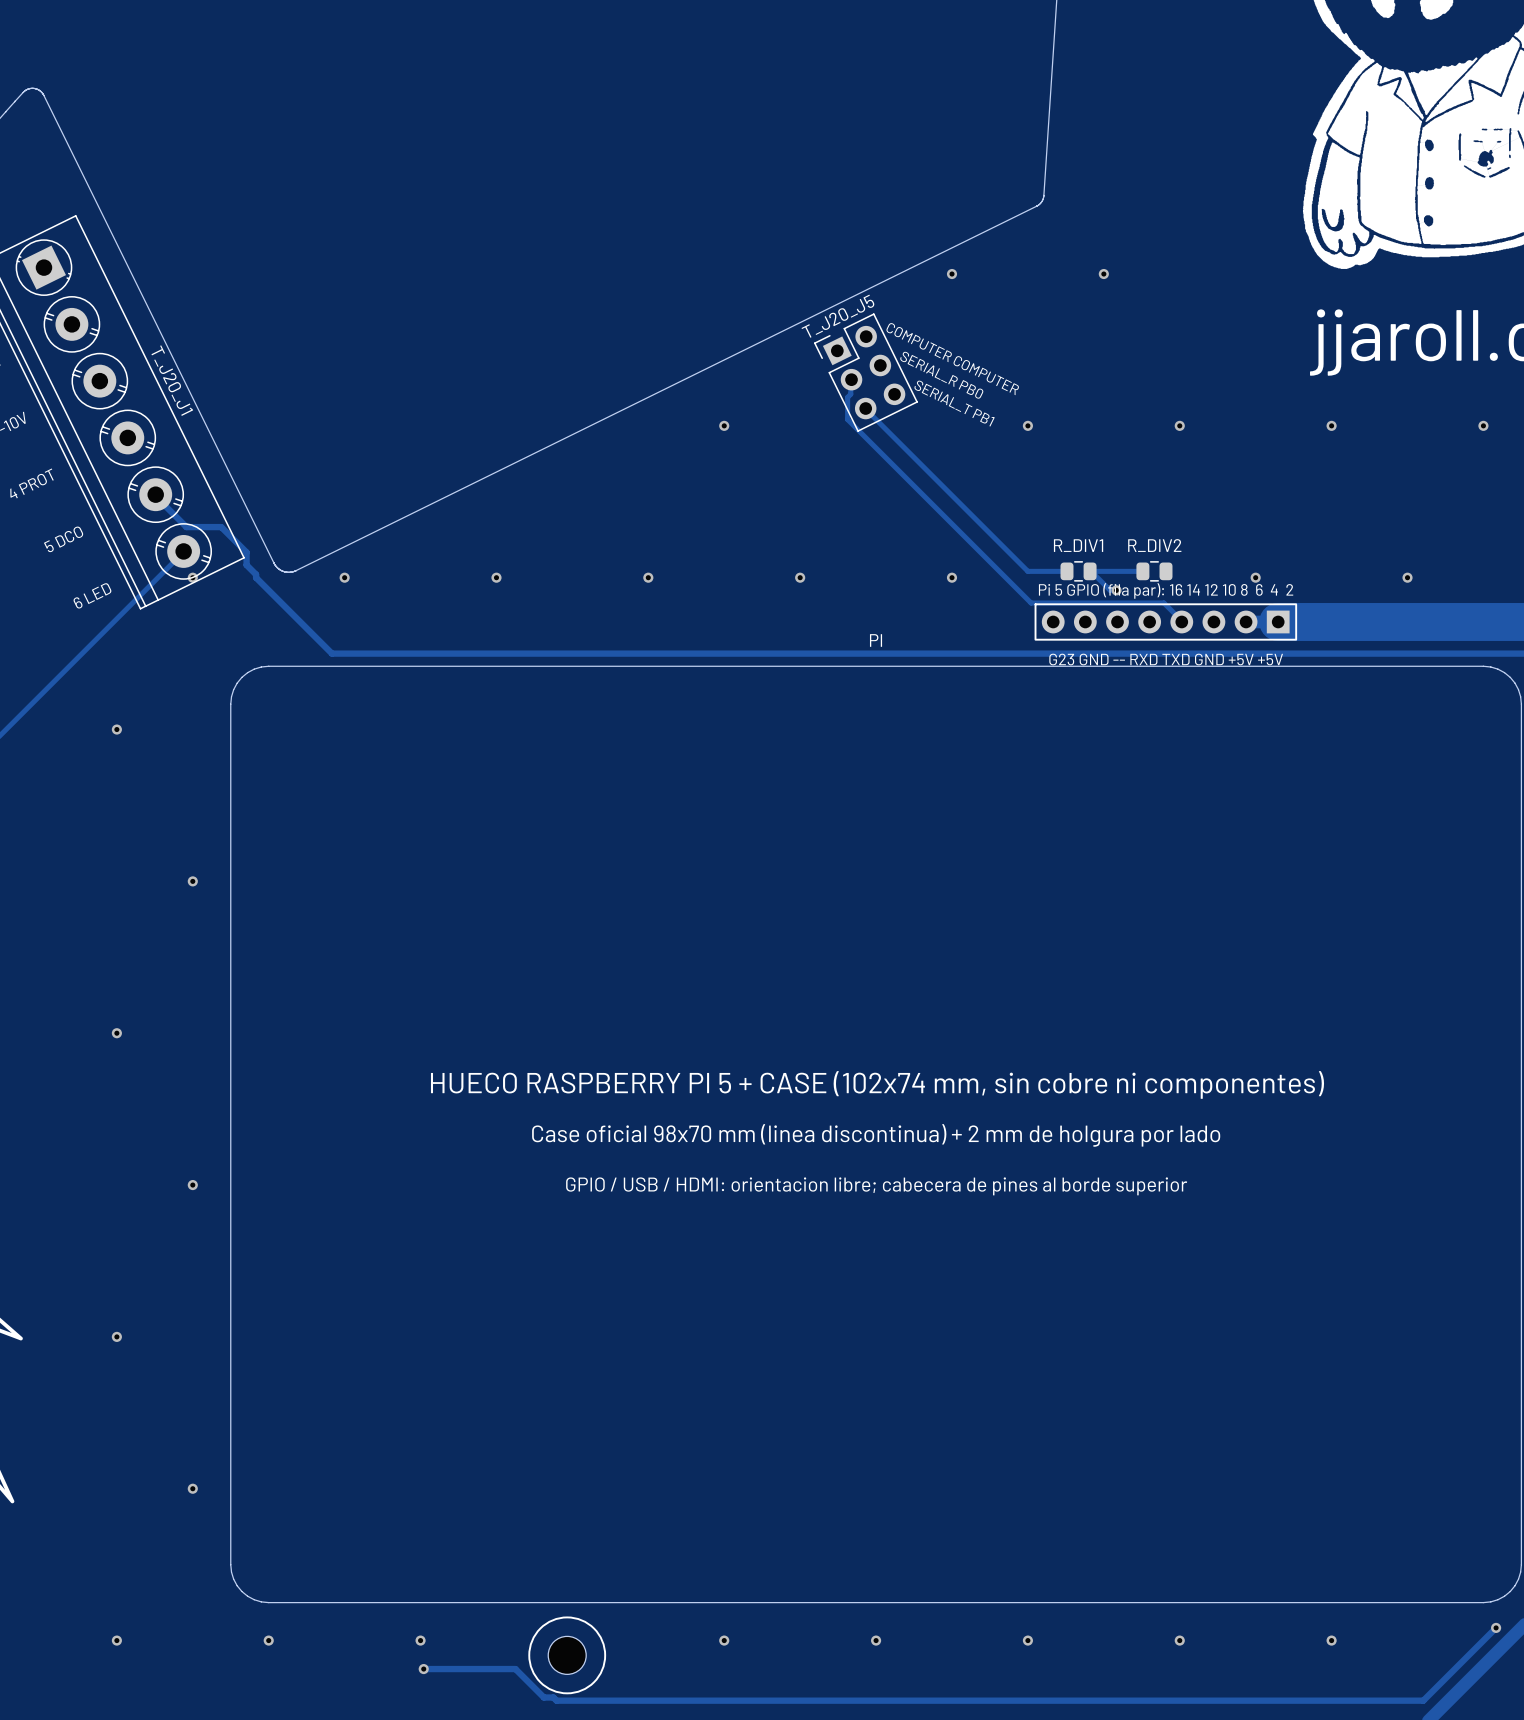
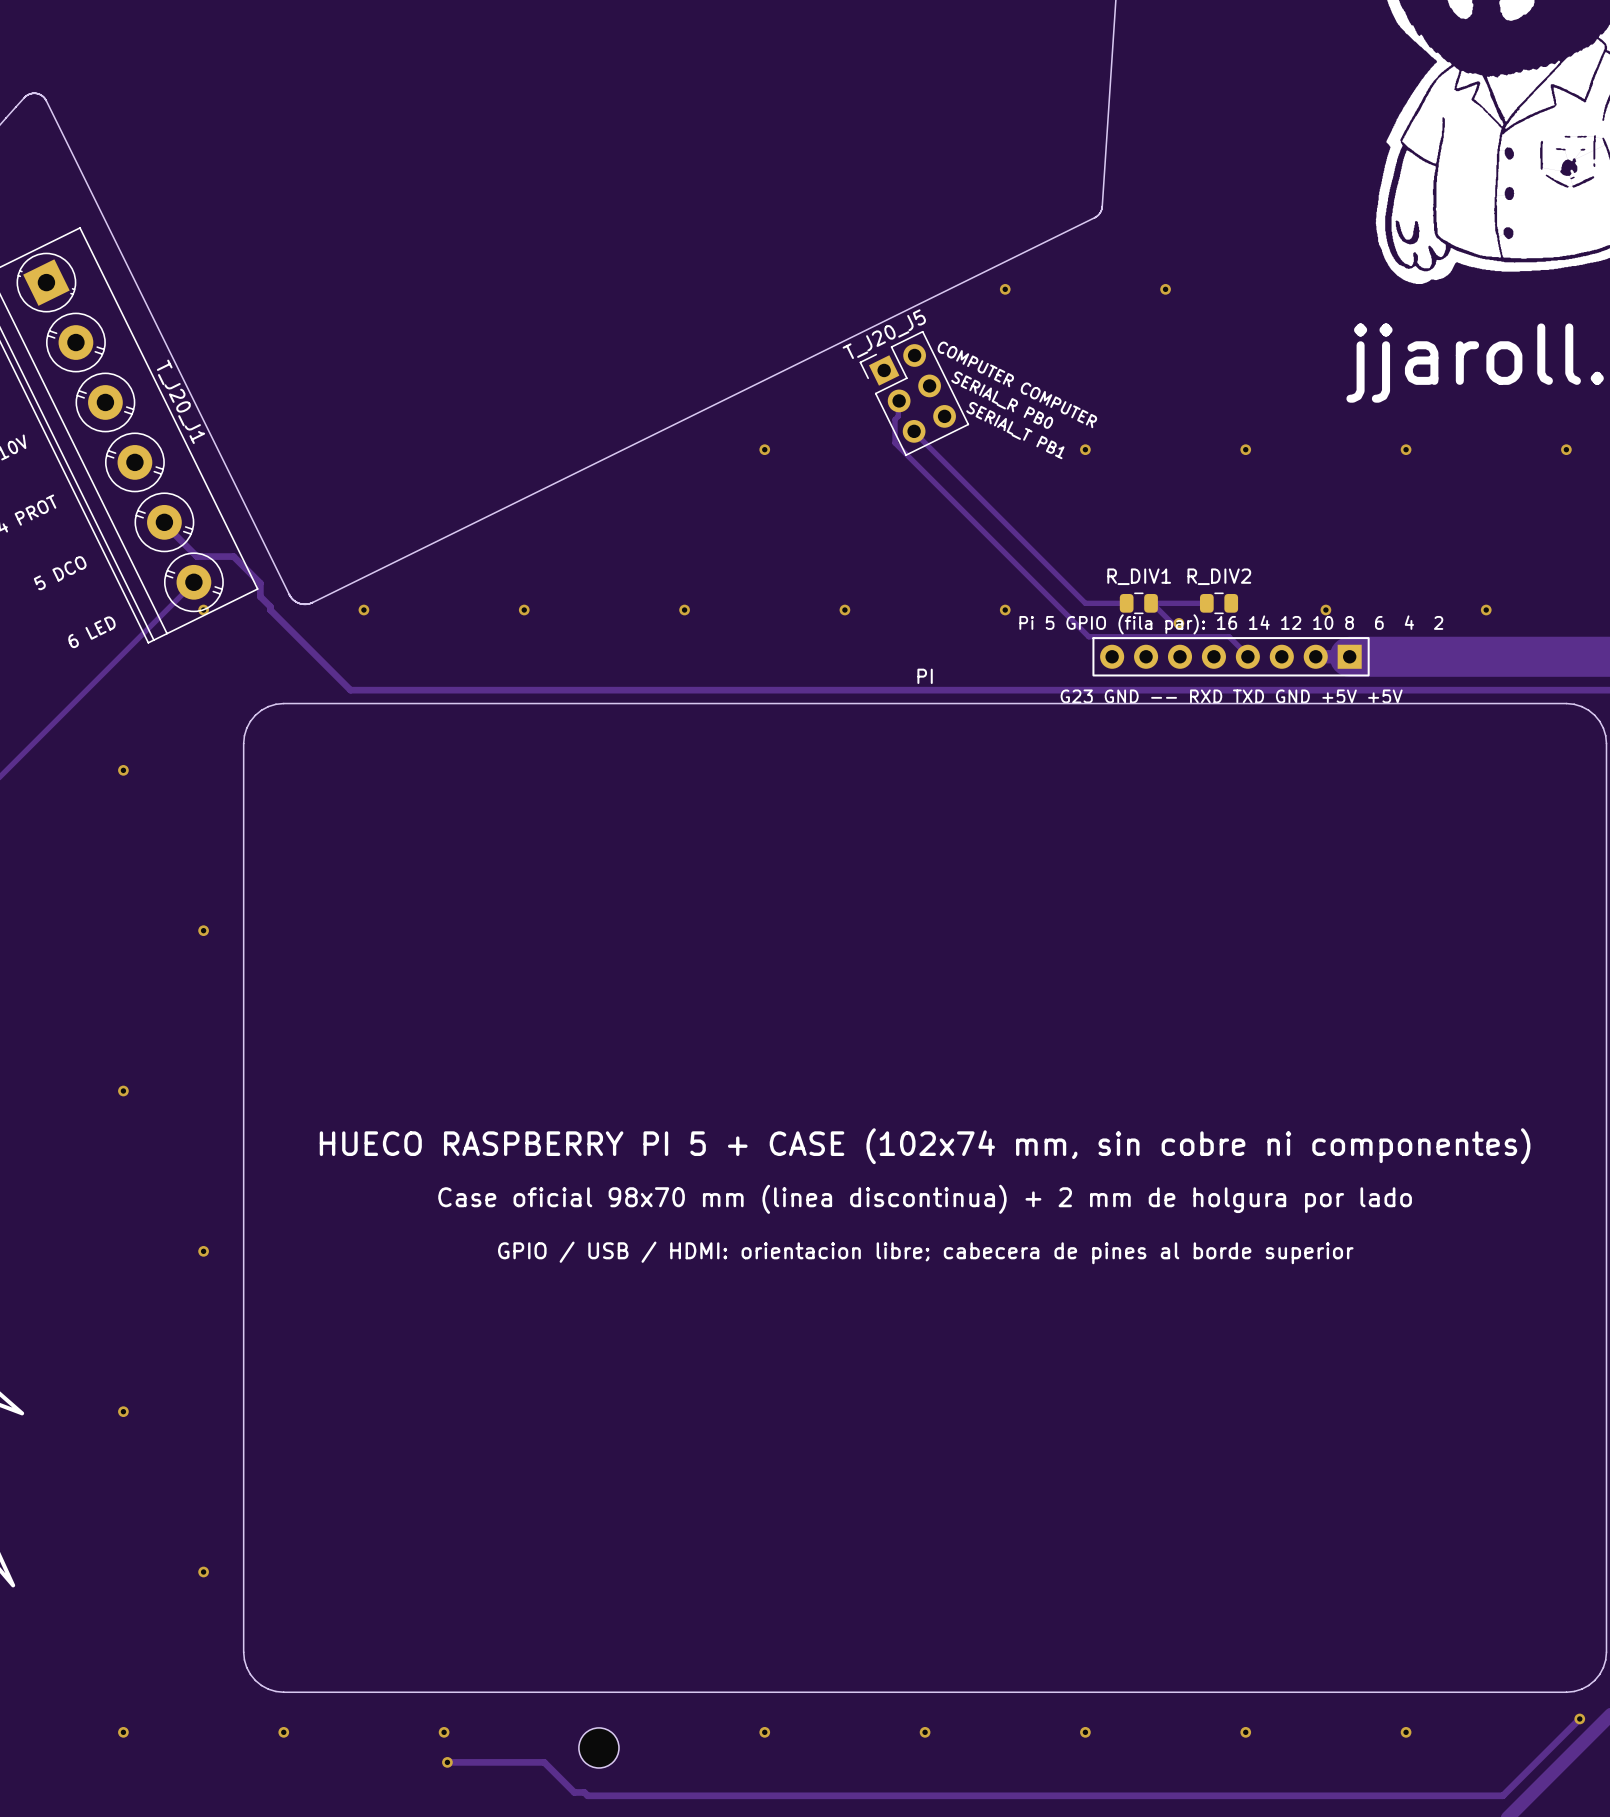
part footprint: [528, 1616, 607, 1695] -> [578, 1727, 619, 1769]

